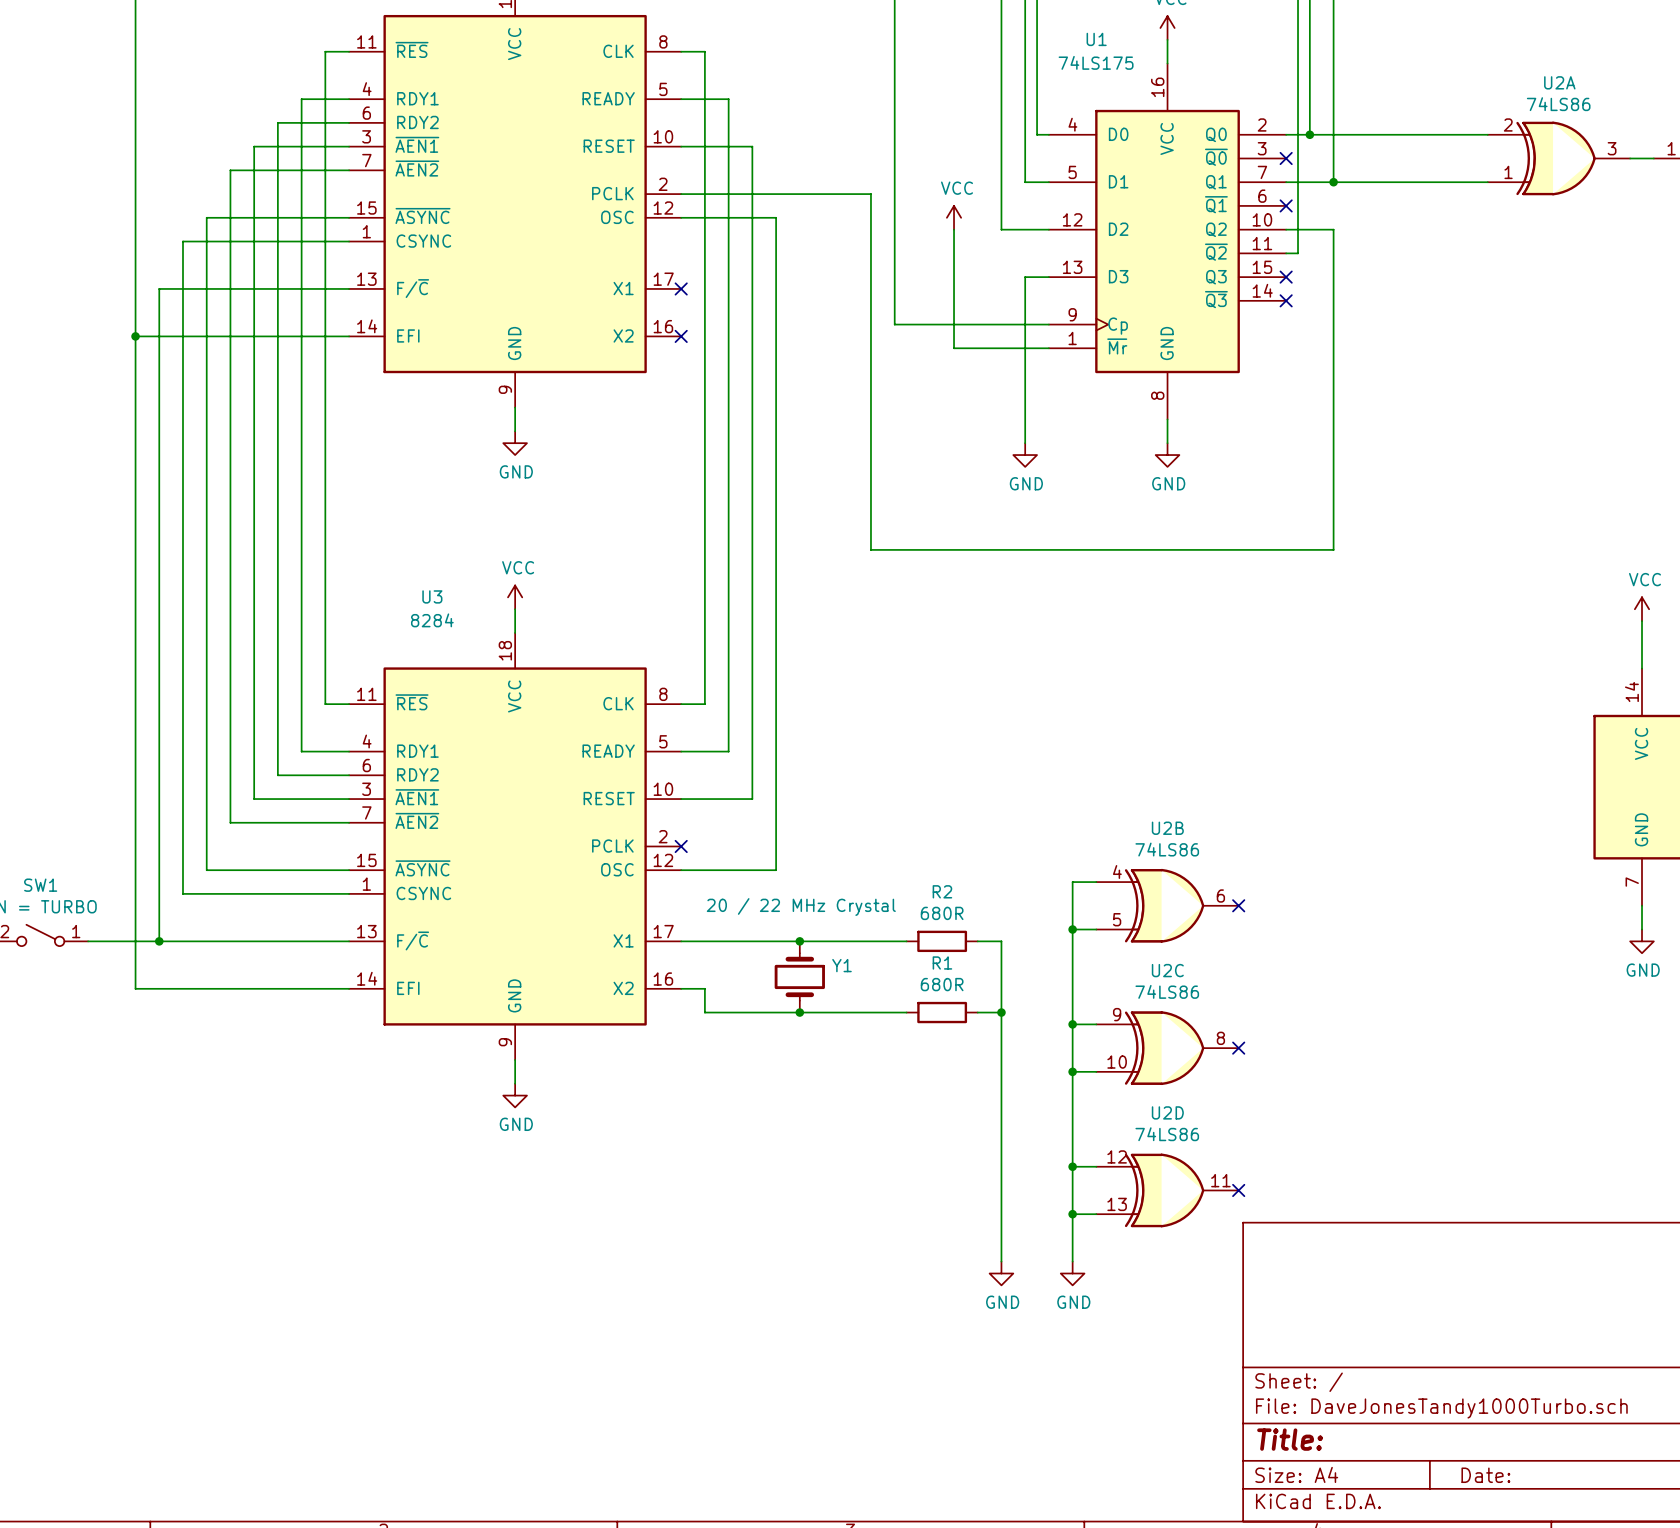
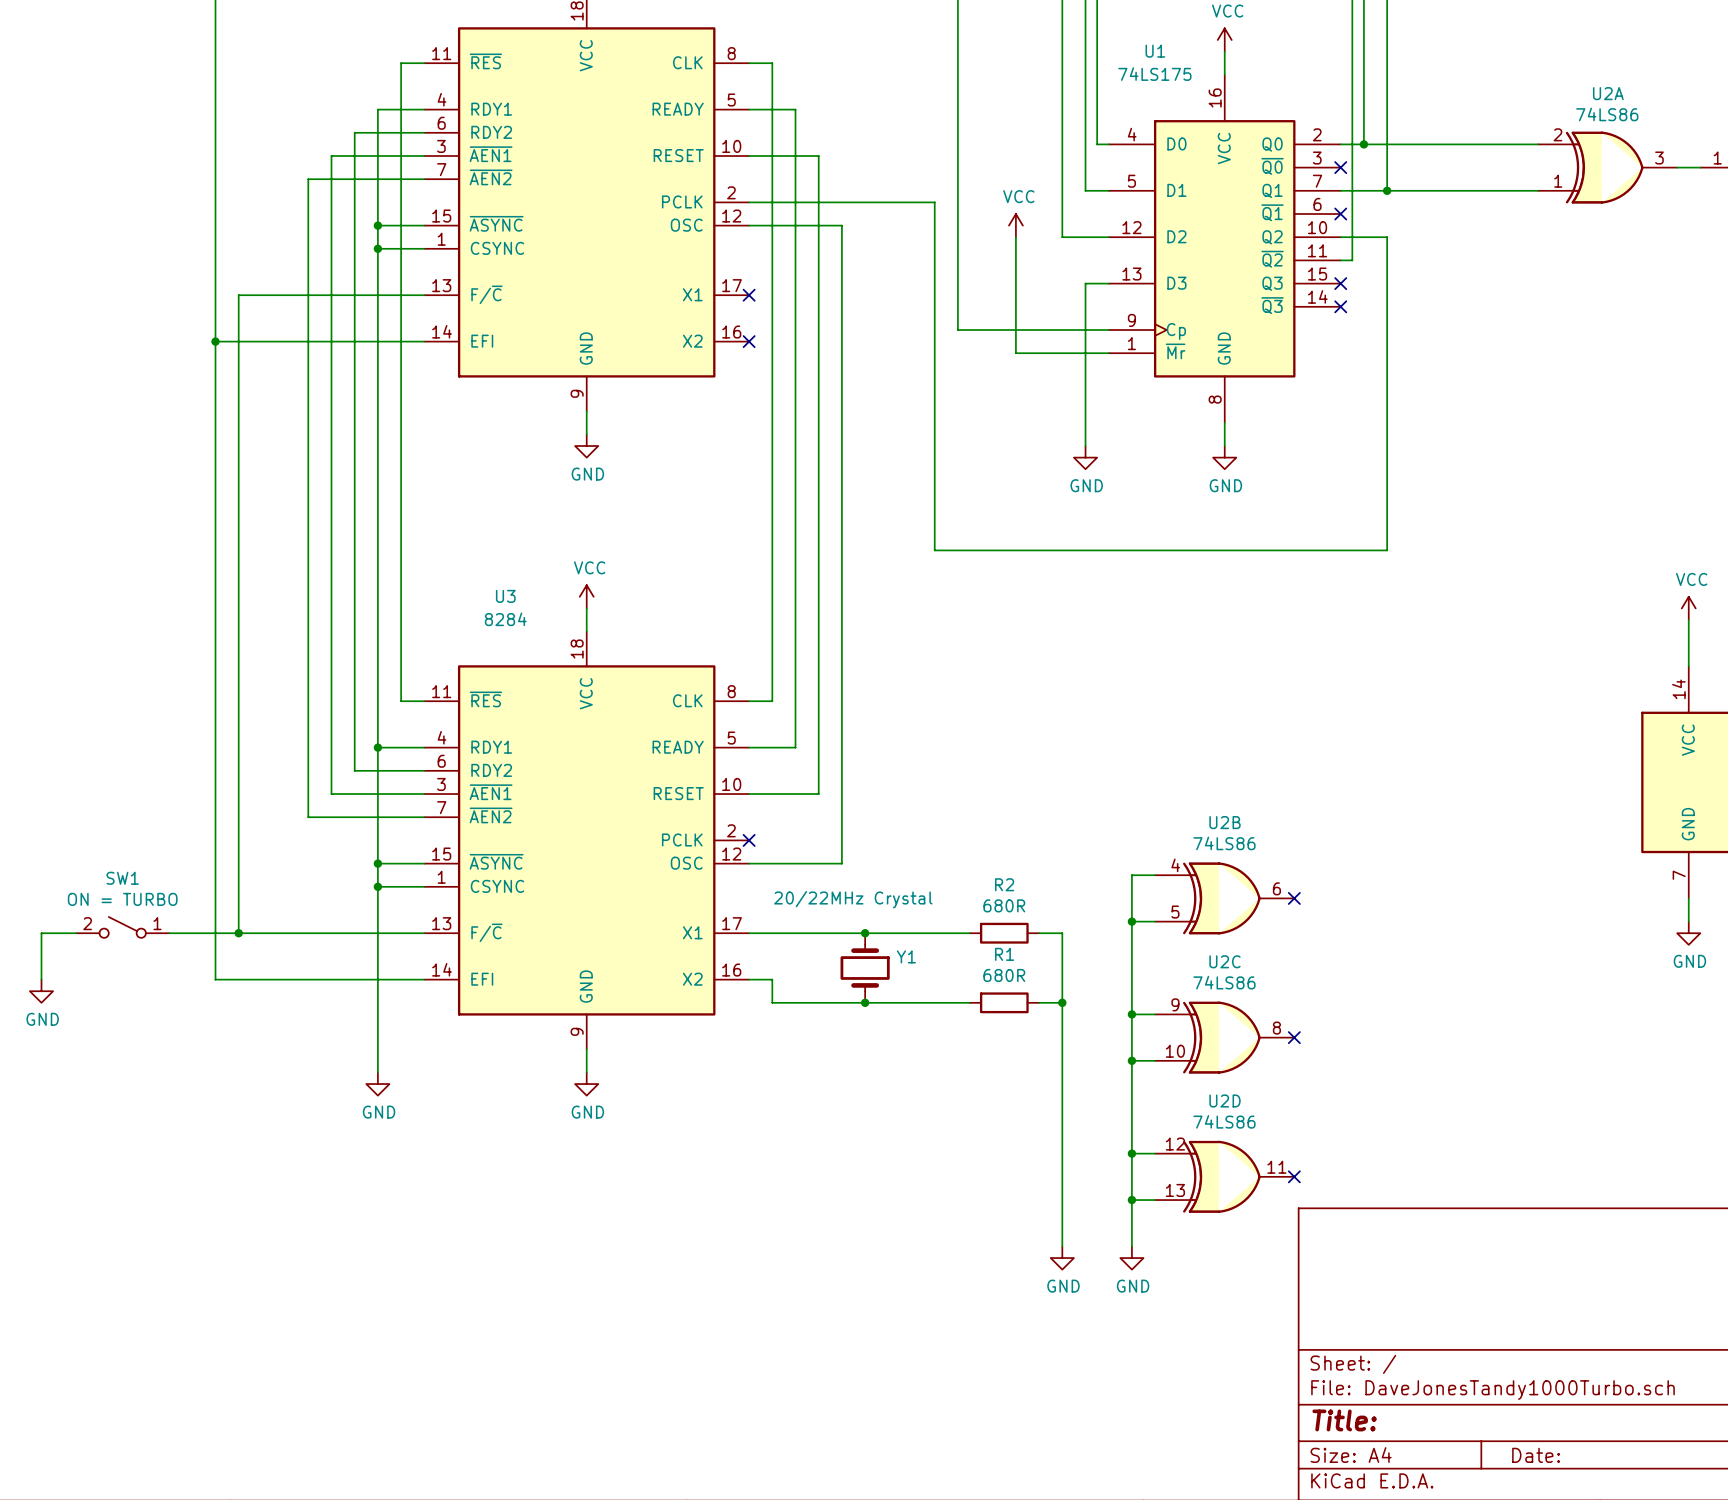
wire: (301, 217) (206, 217) (206, 870) (301, 870) -> none
junction: none -> (377, 225)
wire: (301, 241) (182, 241) (182, 893) (301, 893) -> none
junction: none -> (377, 248)
wire: none -> (377, 747) (377, 1072)
junction: none -> (377, 747)
junction: none -> (377, 863)
junction: none -> (377, 886)
Y1 value: 20 / 22 MHz Crystal (801, 907) -> 20/22MHz Crystal (853, 899)
power symbol: none -> GND (377, 1084)

